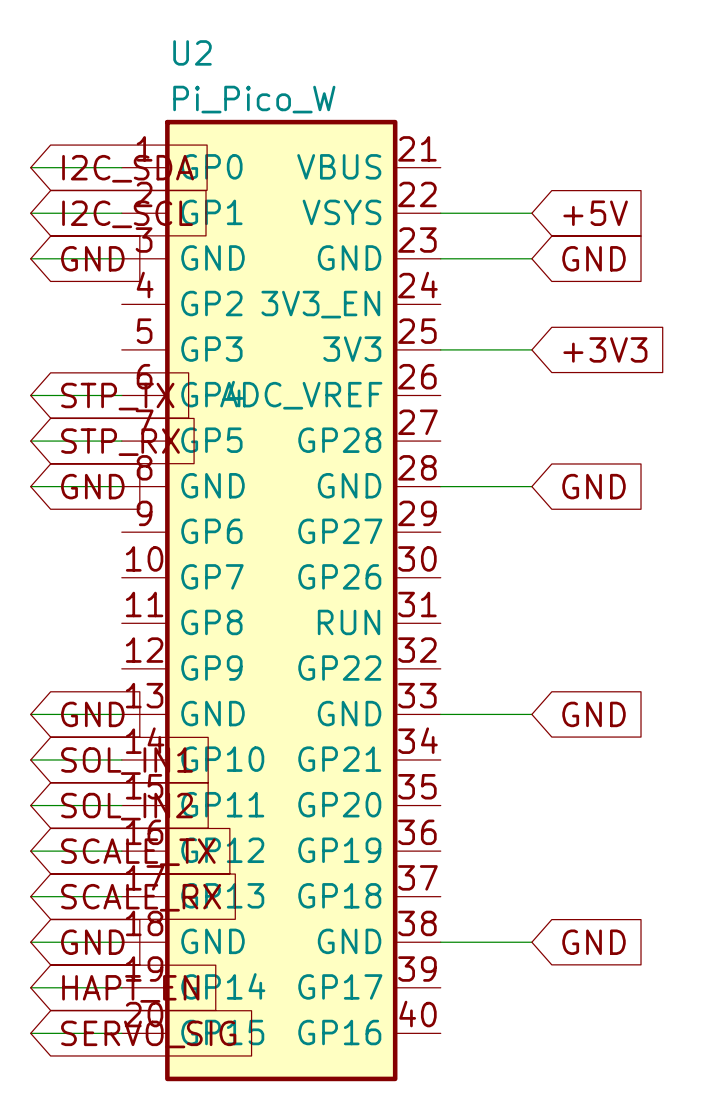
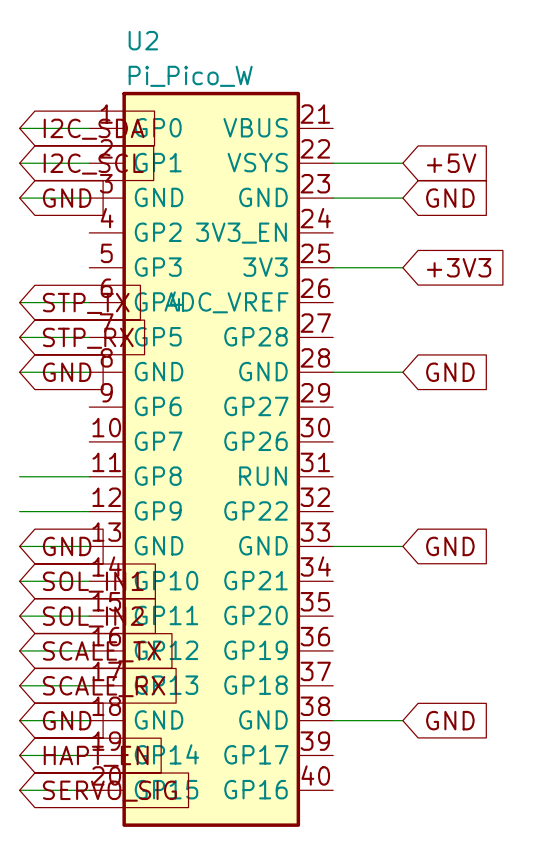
wire: none -> (19, 476) (89, 476)
wire: none -> (19, 511) (89, 511)

